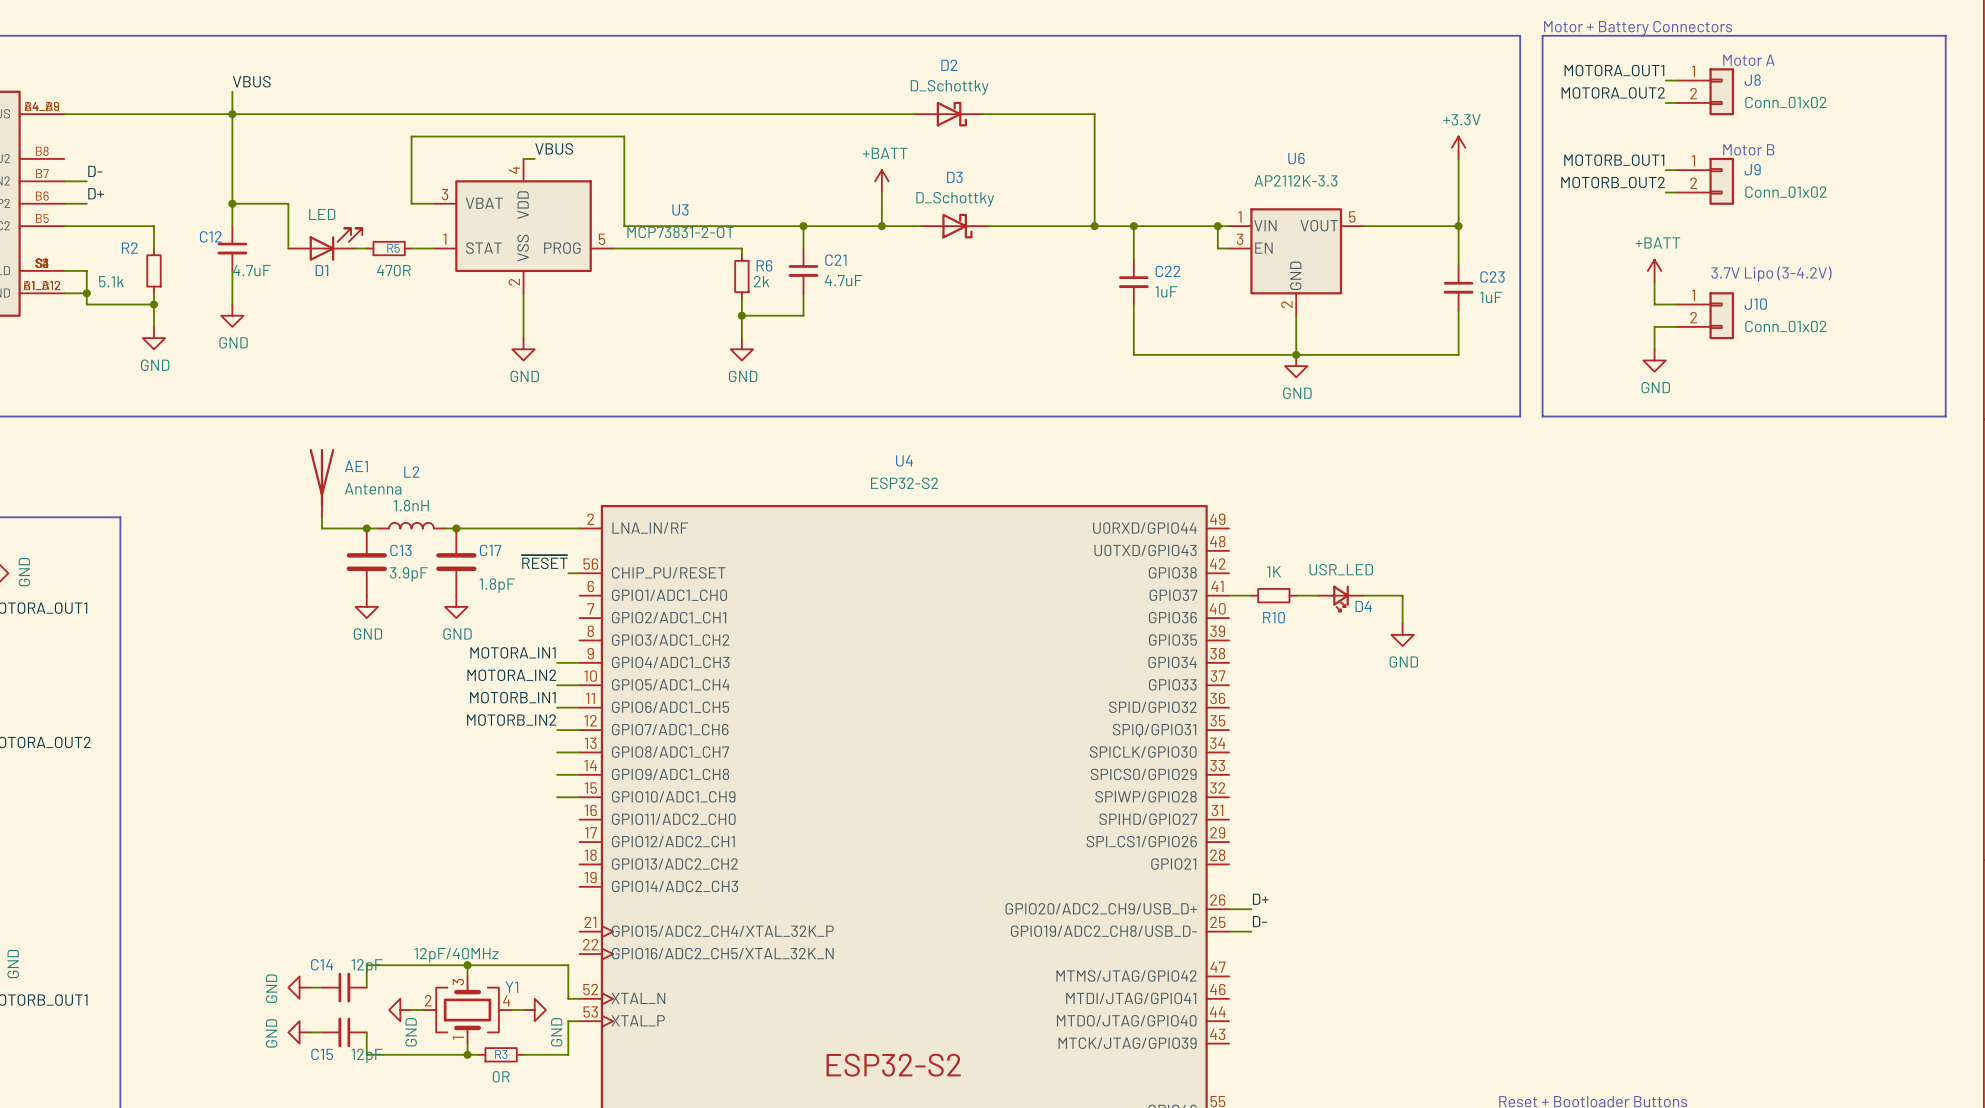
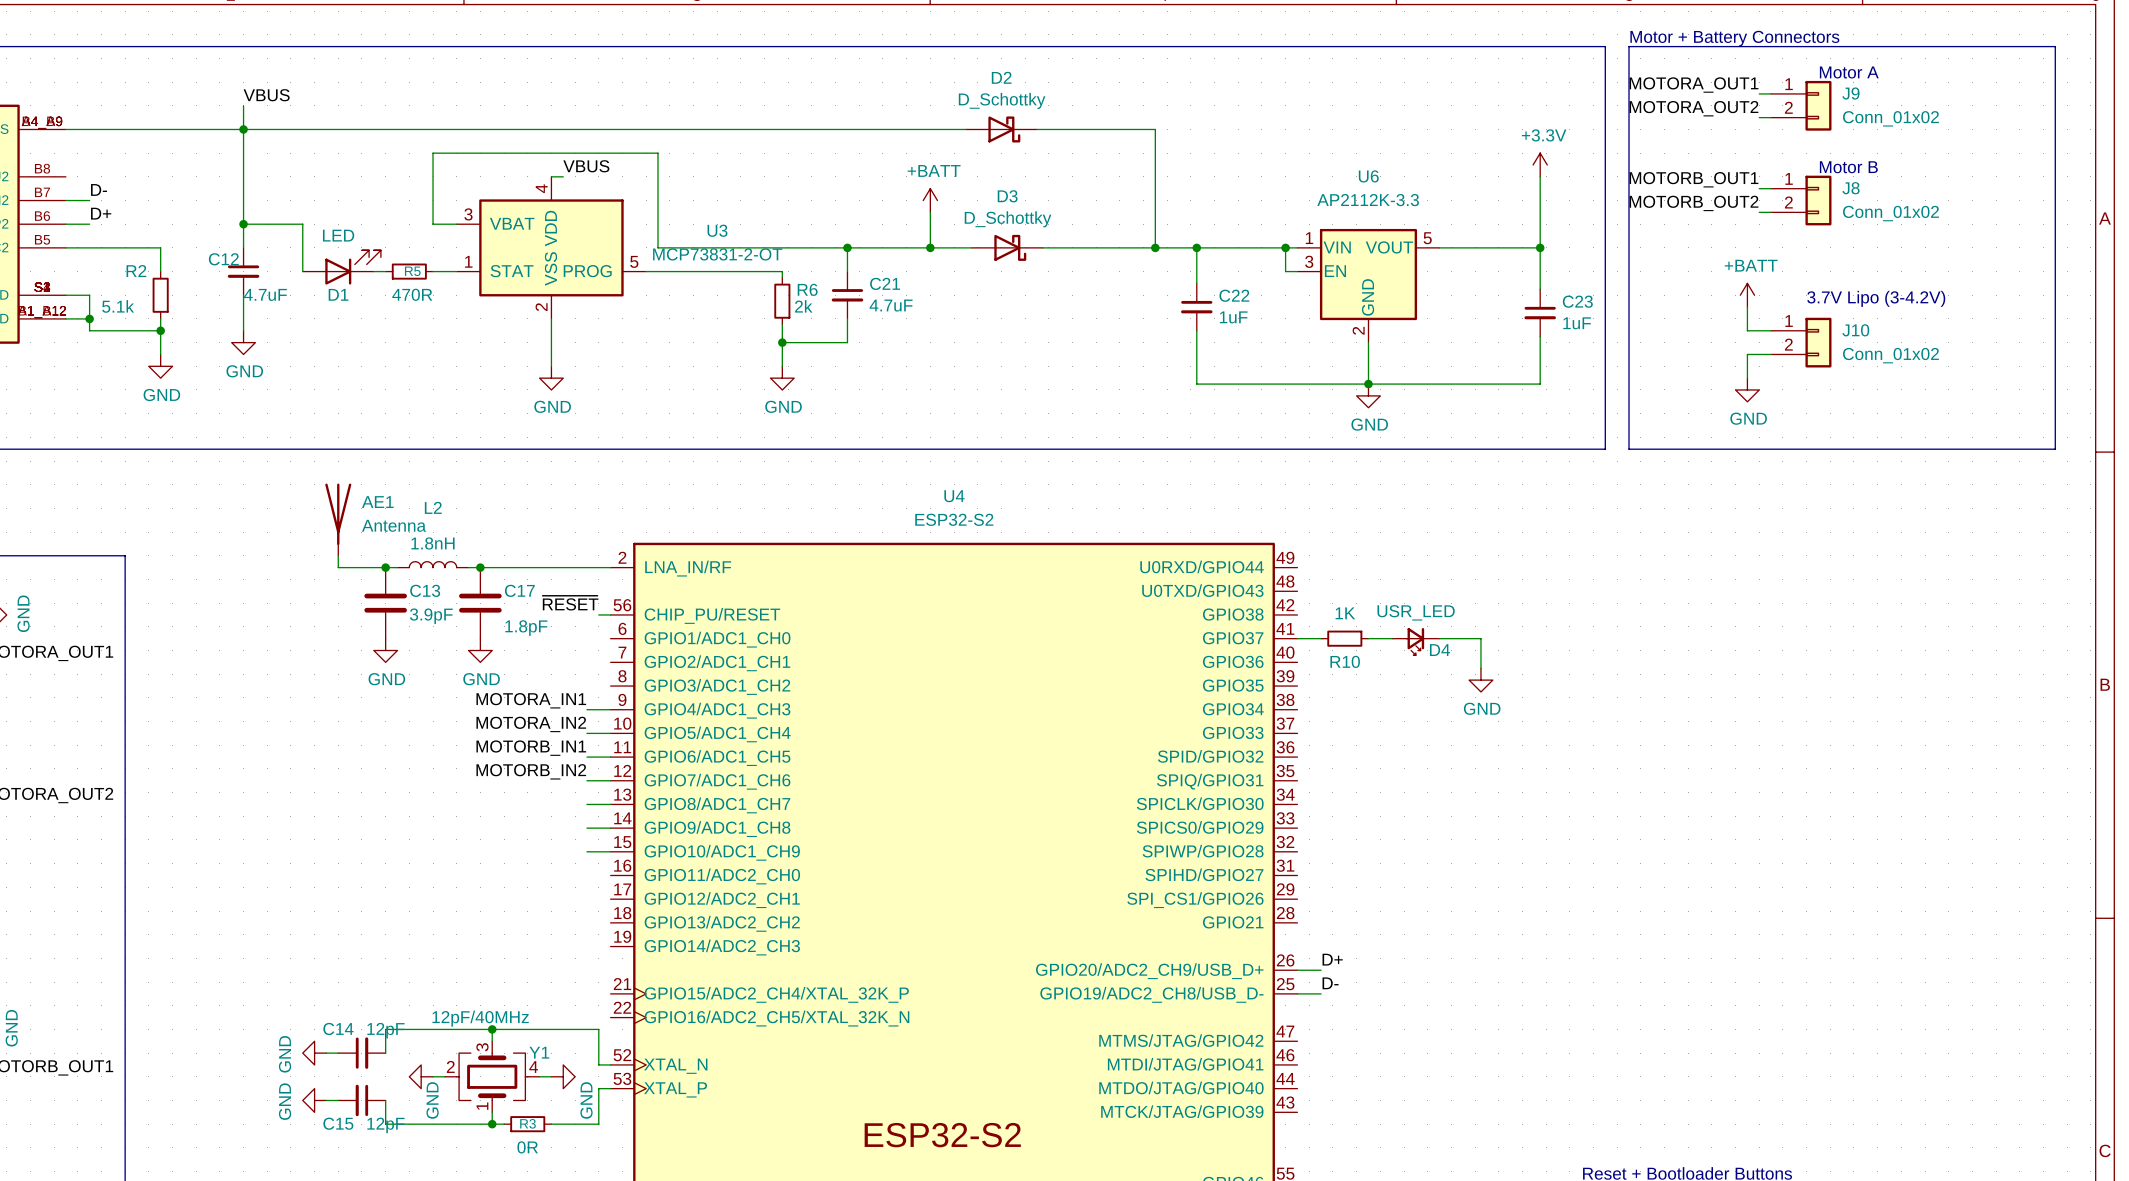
J8 name: J8 (1752, 80) -> J9 (1850, 93)
J9 name: J9 (1752, 169) -> J8 (1850, 188)

